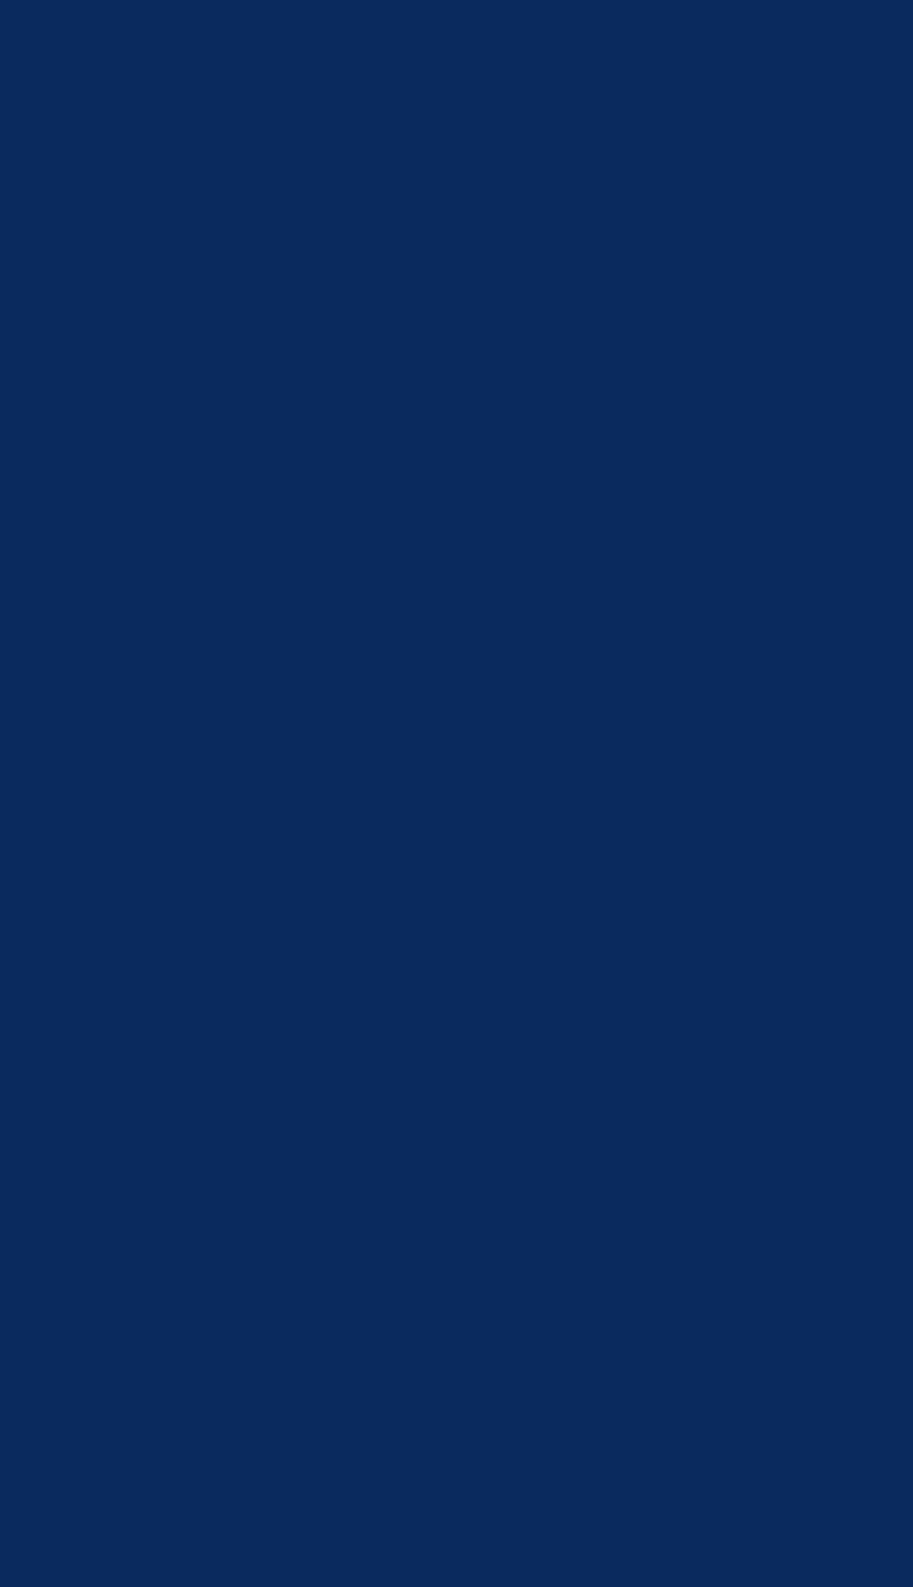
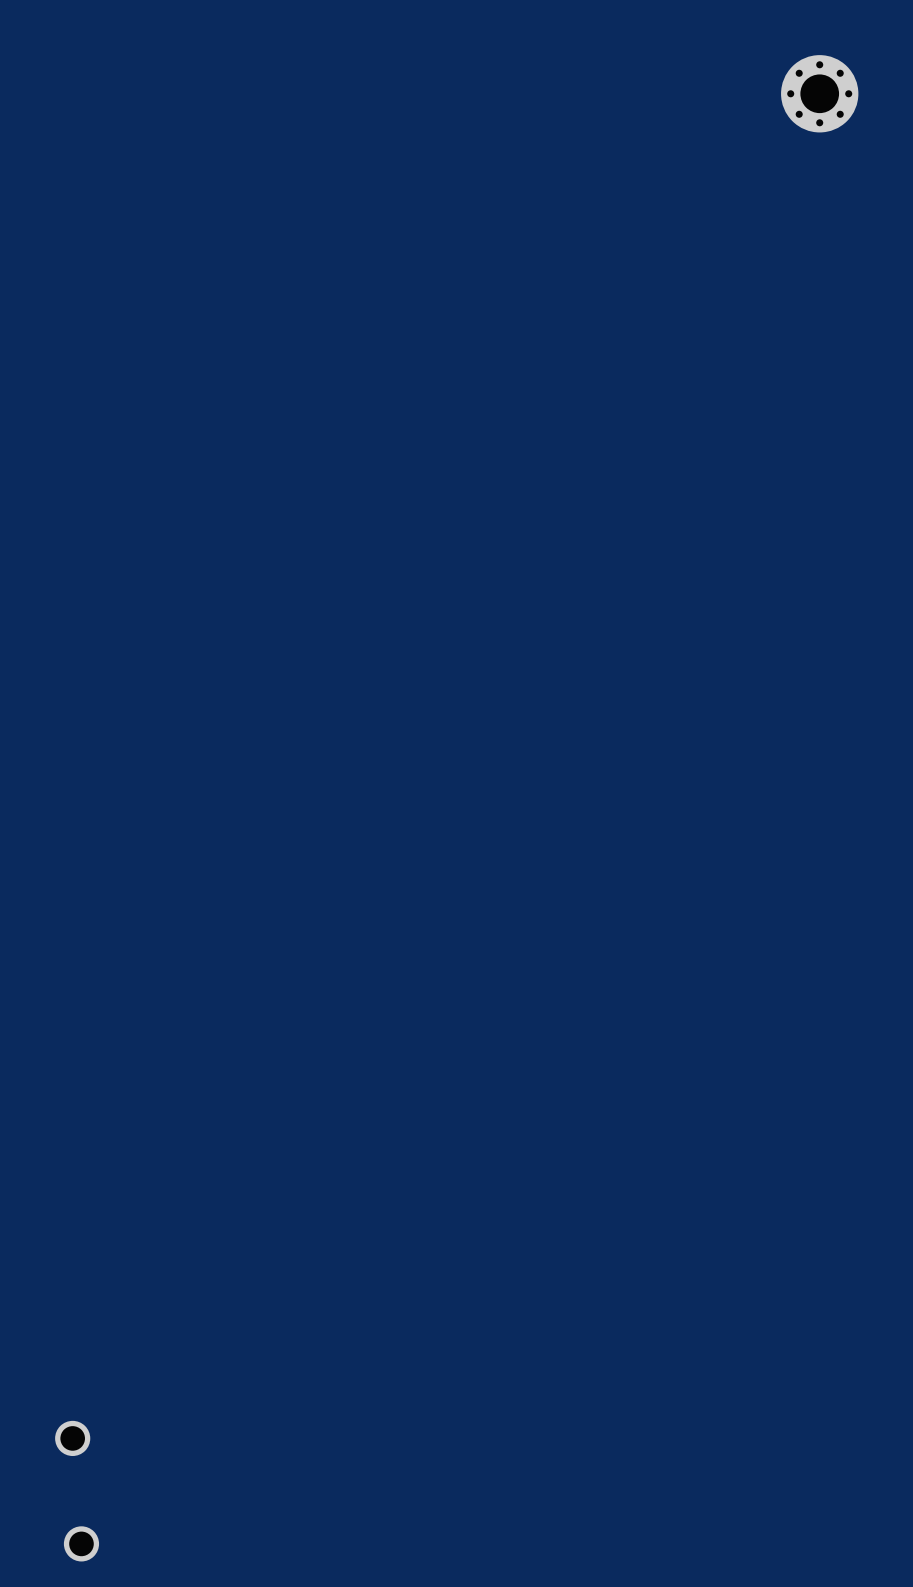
part: none -> (819, 93)
part: none -> (72, 1438)
part: none -> (81, 1543)

